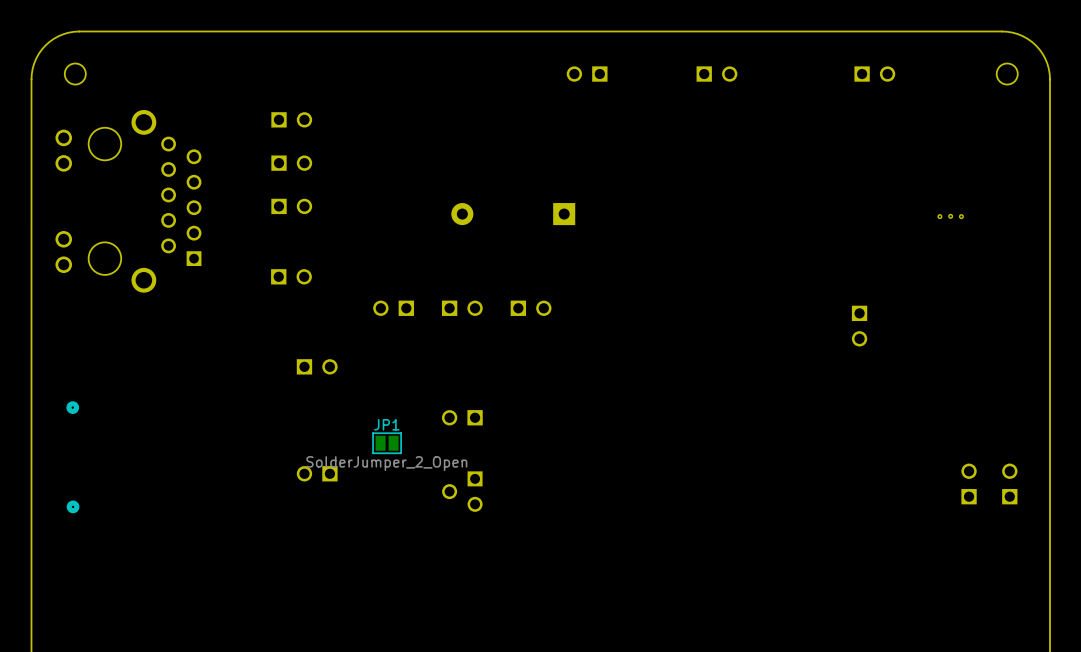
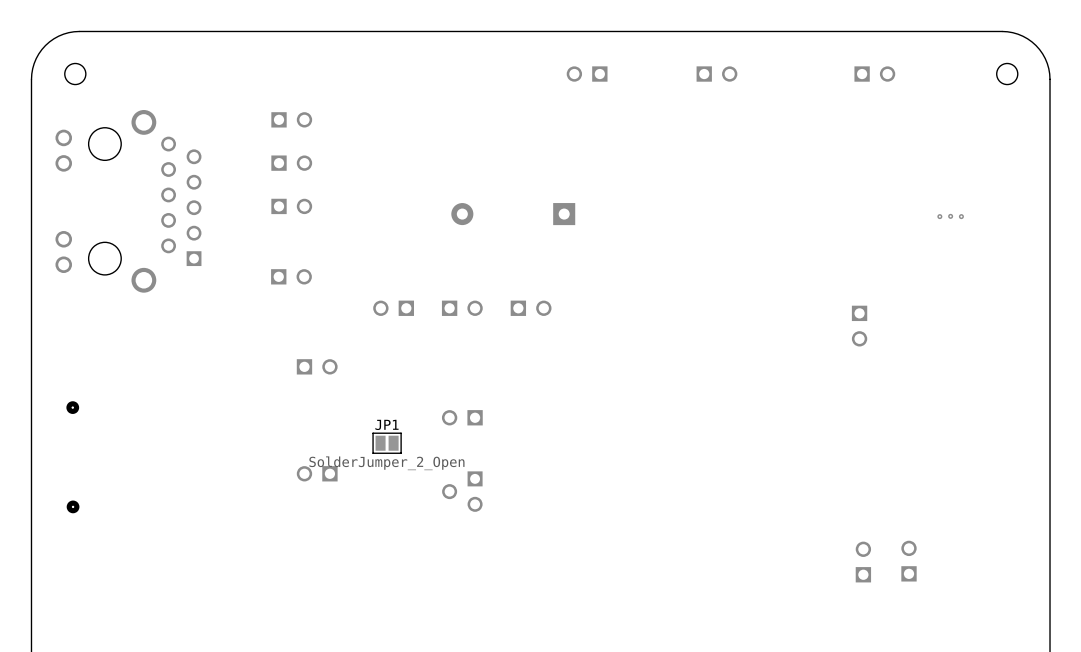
part: (969, 483) -> none
part: (1009, 483) -> none
part: none -> (909, 561)
part: none -> (863, 562)

